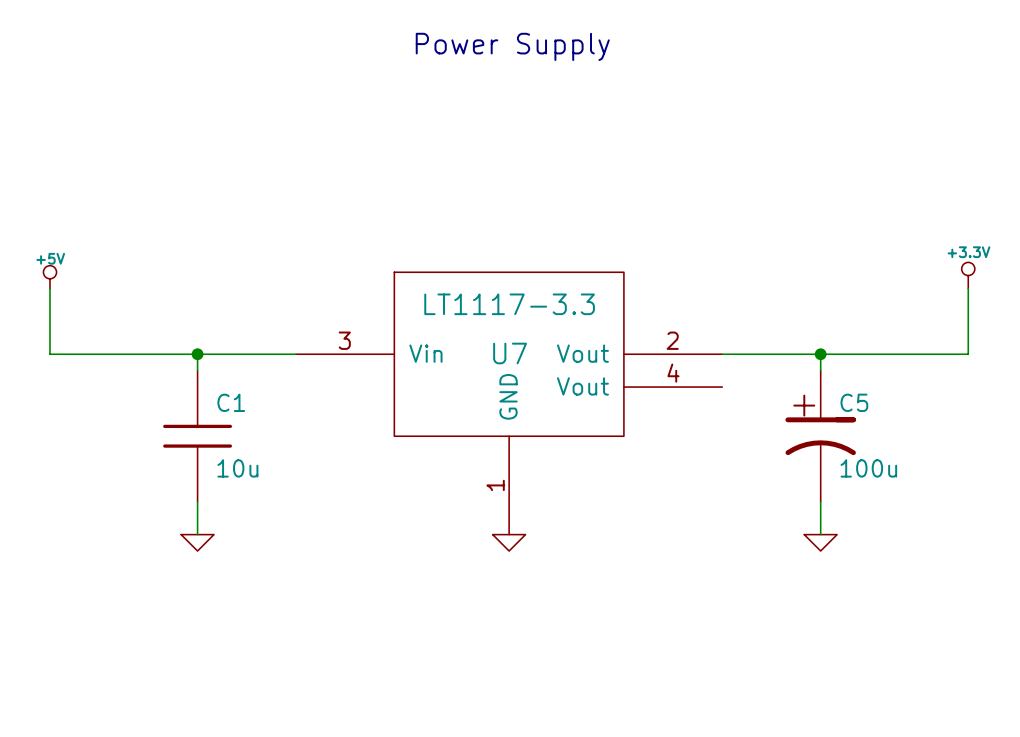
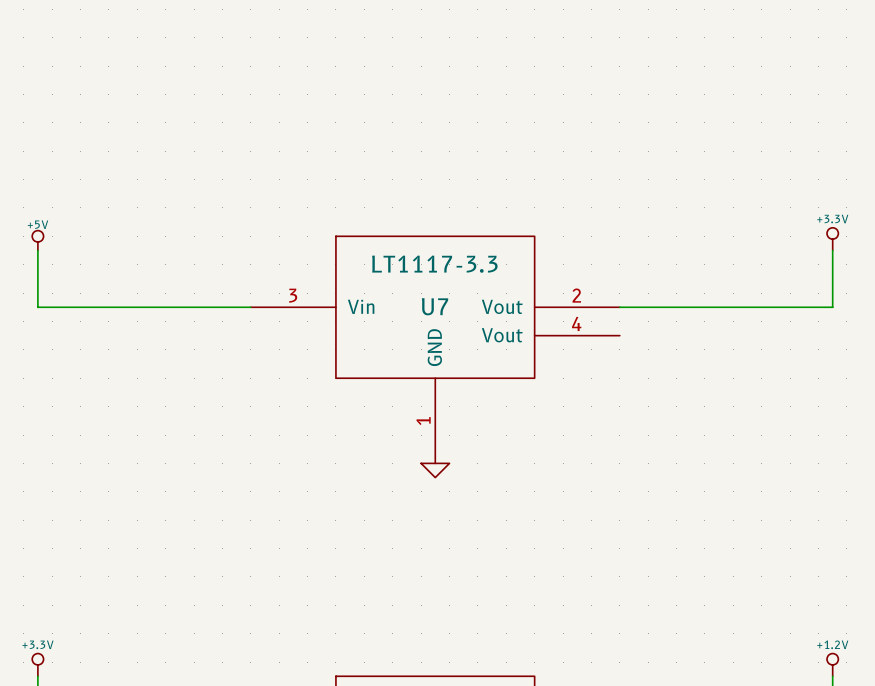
text: Power Supply (512, 46) -> none
wire: (197, 354) (197, 370) -> none
junction: (197, 354) -> none
wire: (820, 354) (820, 370) -> none
junction: (820, 354) -> none
C1: 10u (197, 436) -> none
C5: 100u (820, 436) -> none
wire: (197, 501) (197, 534) -> none
wire: (820, 501) (820, 534) -> none
power symbol: (197, 542) -> none
power symbol: (820, 542) -> none

